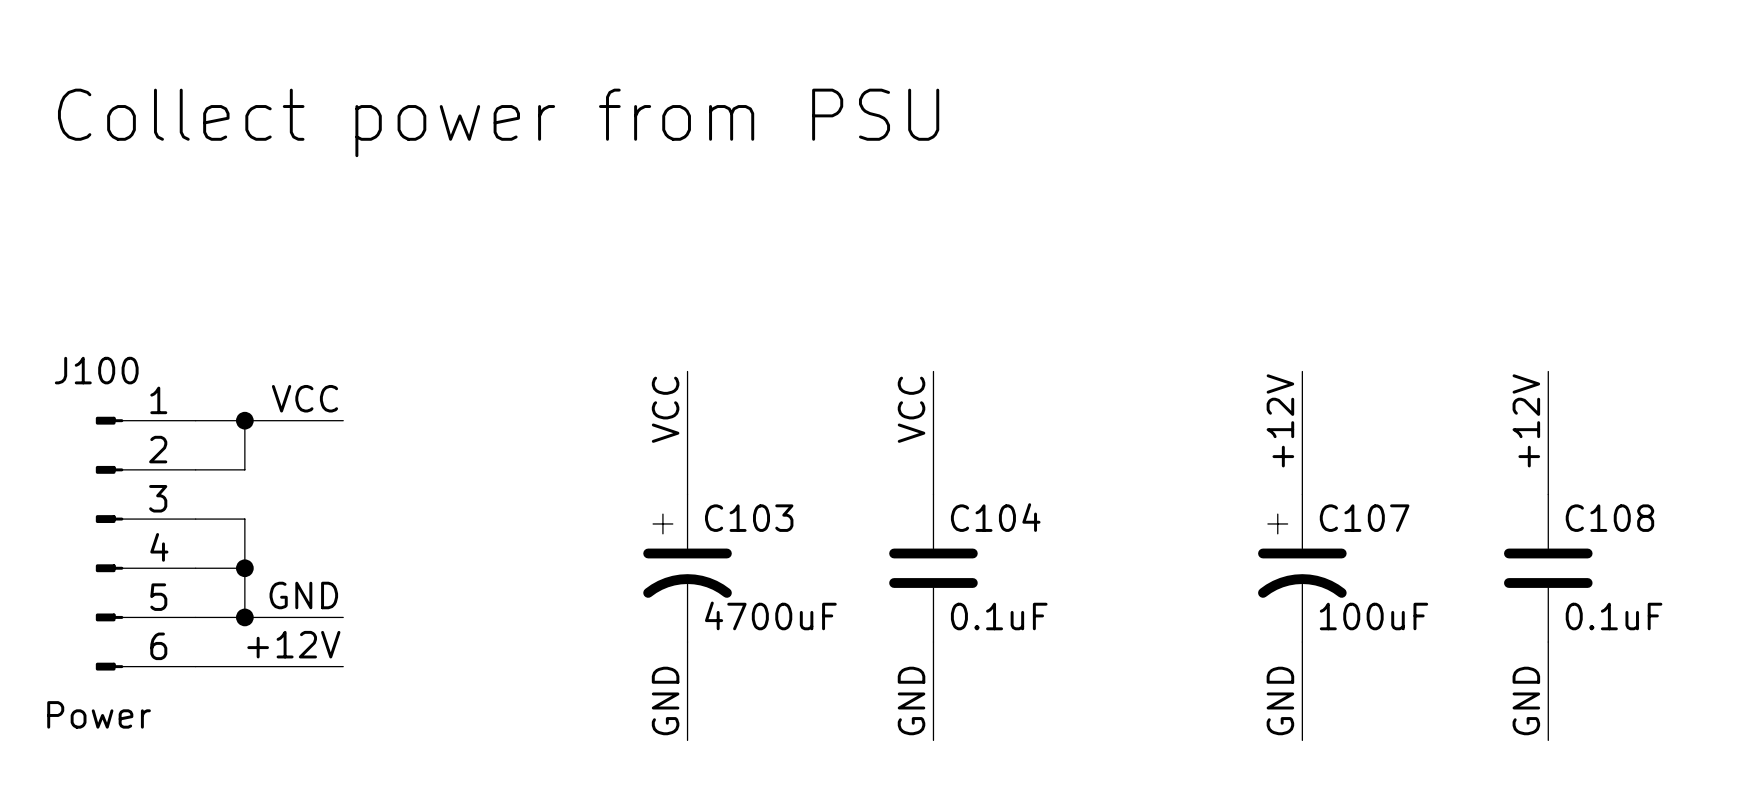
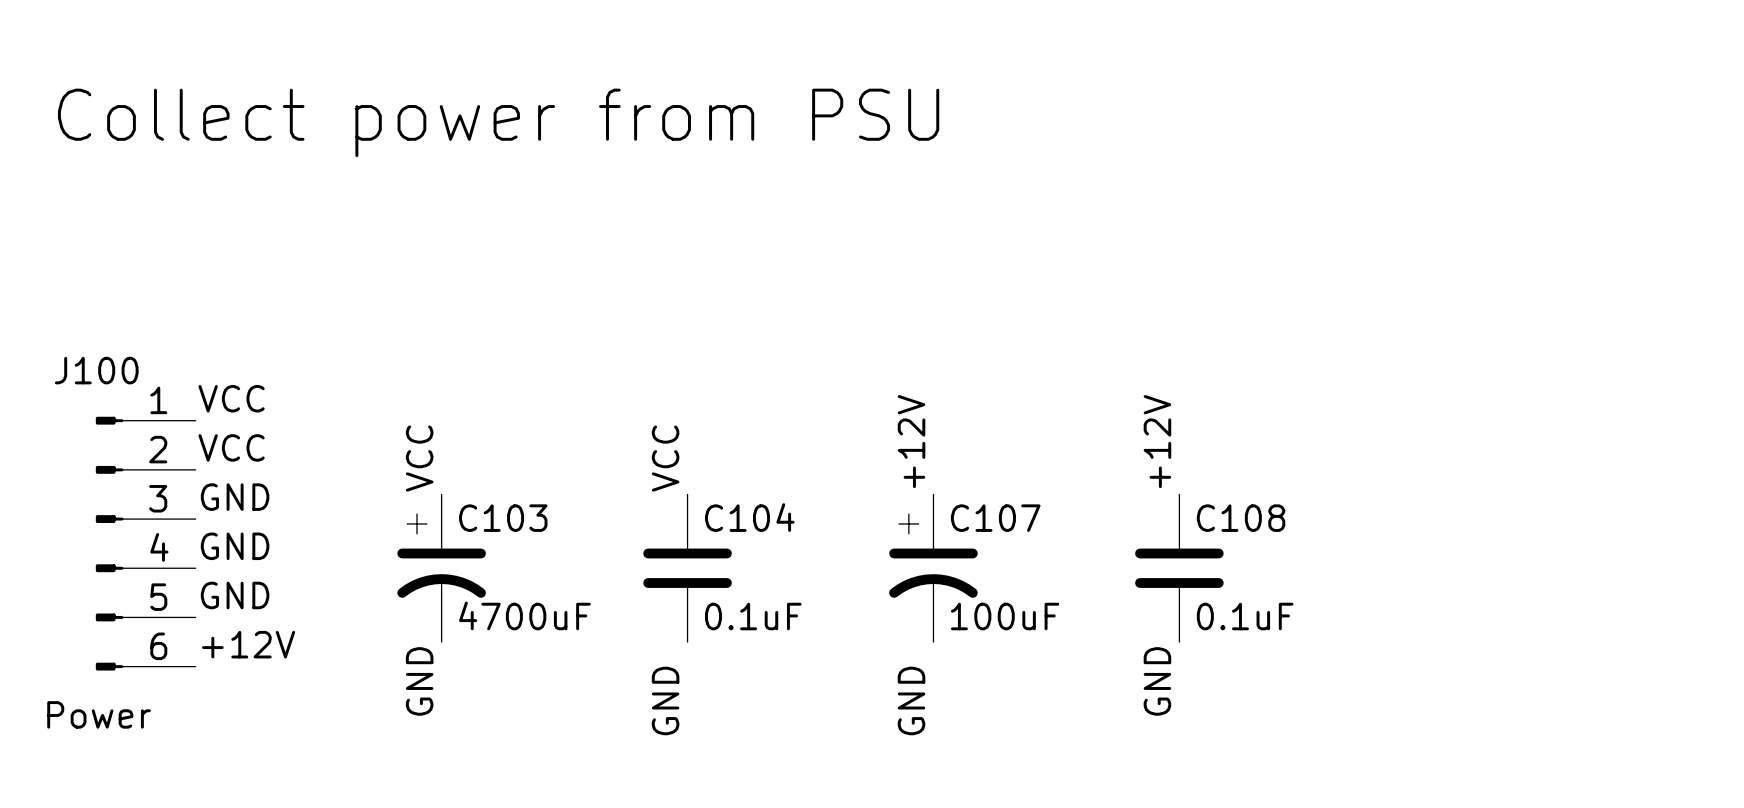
wire: (687, 371) (687, 494) -> none
wire: (933, 371) (933, 494) -> none
wire: (1302, 371) (1302, 494) -> none
wire: (1548, 371) (1548, 494) -> none
label: none -> VCC (231, 398)
label: VCC (304, 398) -> none
label position: VCC (665, 409) -> VCC (665, 458)
label: VCC (911, 409) -> none
wire: (195, 420) (343, 420) -> none
wire: (244, 420) (244, 469) (195, 469) -> none
junction: (244, 420) -> none
label position: +12V (1280, 420) -> +12V (1157, 441)
label: +12V (1526, 420) -> none
label: none -> +12V (911, 441)
label: none -> VCC (231, 447)
label: none -> VCC (419, 458)
label: none -> GND (235, 497)
wire: (195, 519) (244, 519) (244, 617) -> none
label: none -> GND (235, 546)
wire: (195, 568) (244, 568) -> none
junction: (244, 568) -> none
C103 position: (687, 568) -> (441, 568)
C104 position: (933, 568) -> (687, 568)
C107 position: (1302, 568) -> (933, 568)
C108 position: (1548, 568) -> (1179, 568)
label: none -> GND (235, 595)
label: GND (303, 595) -> none
wire: (195, 617) (343, 617) -> none
junction: (244, 617) -> none
wire: (687, 642) (687, 740) -> none
wire: (933, 642) (933, 740) -> none
wire: (1302, 642) (1302, 740) -> none
wire: (1548, 642) (1548, 740) -> none
label position: +12V (293, 644) -> +12V (248, 644)
wire: (195, 666) (343, 666) -> none
label: none -> GND (419, 681)
label position: GND (1280, 700) -> GND (1157, 681)
label: GND (1526, 700) -> none

